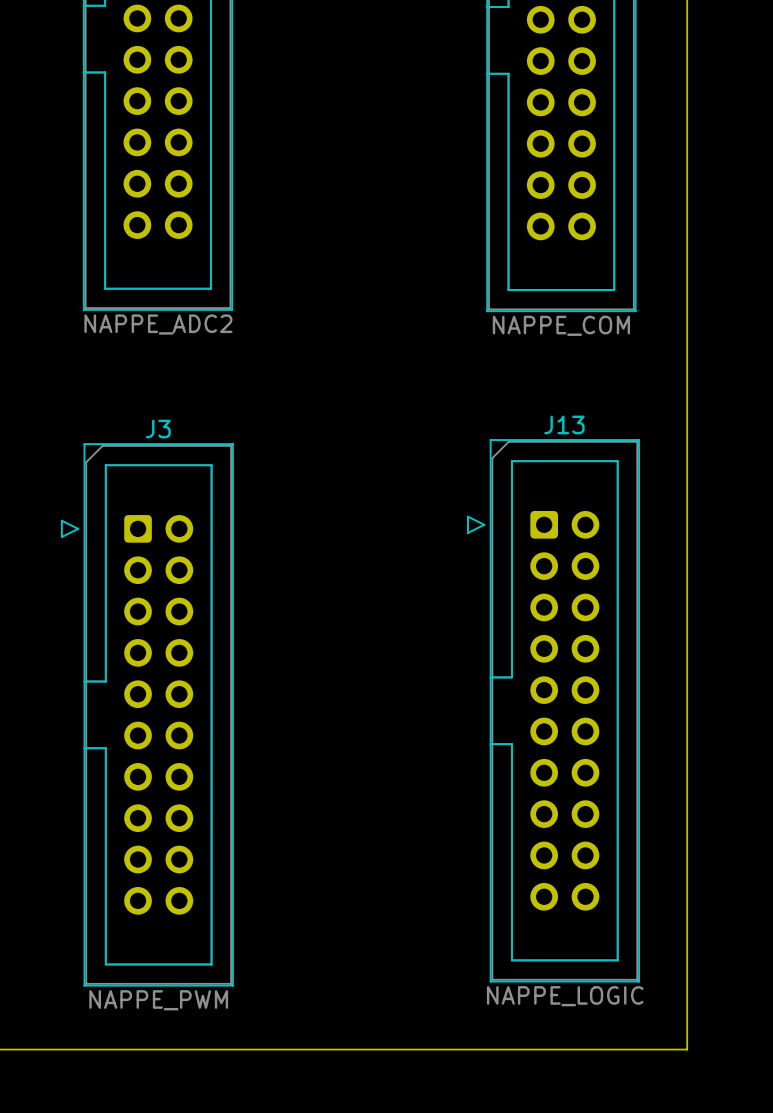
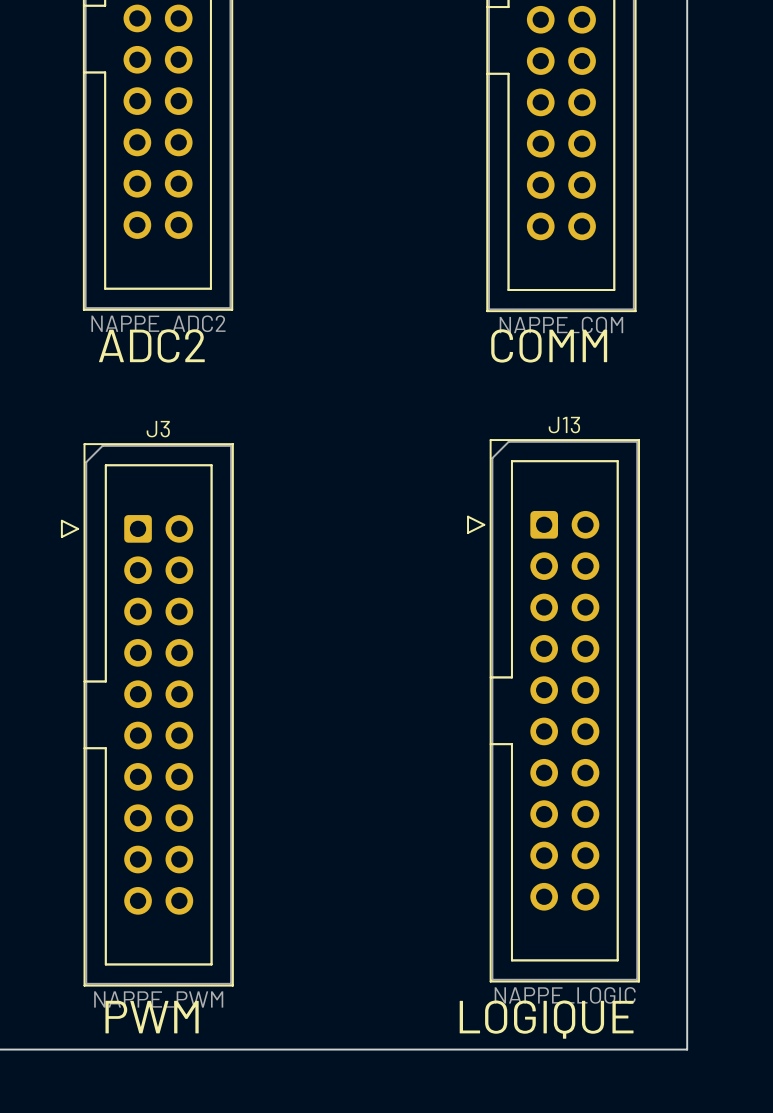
text: none -> ADC2 (151, 345)
text: none -> COMM (549, 345)
text: none -> PWM (152, 1017)
text: none -> LOGIQUE (546, 1019)

